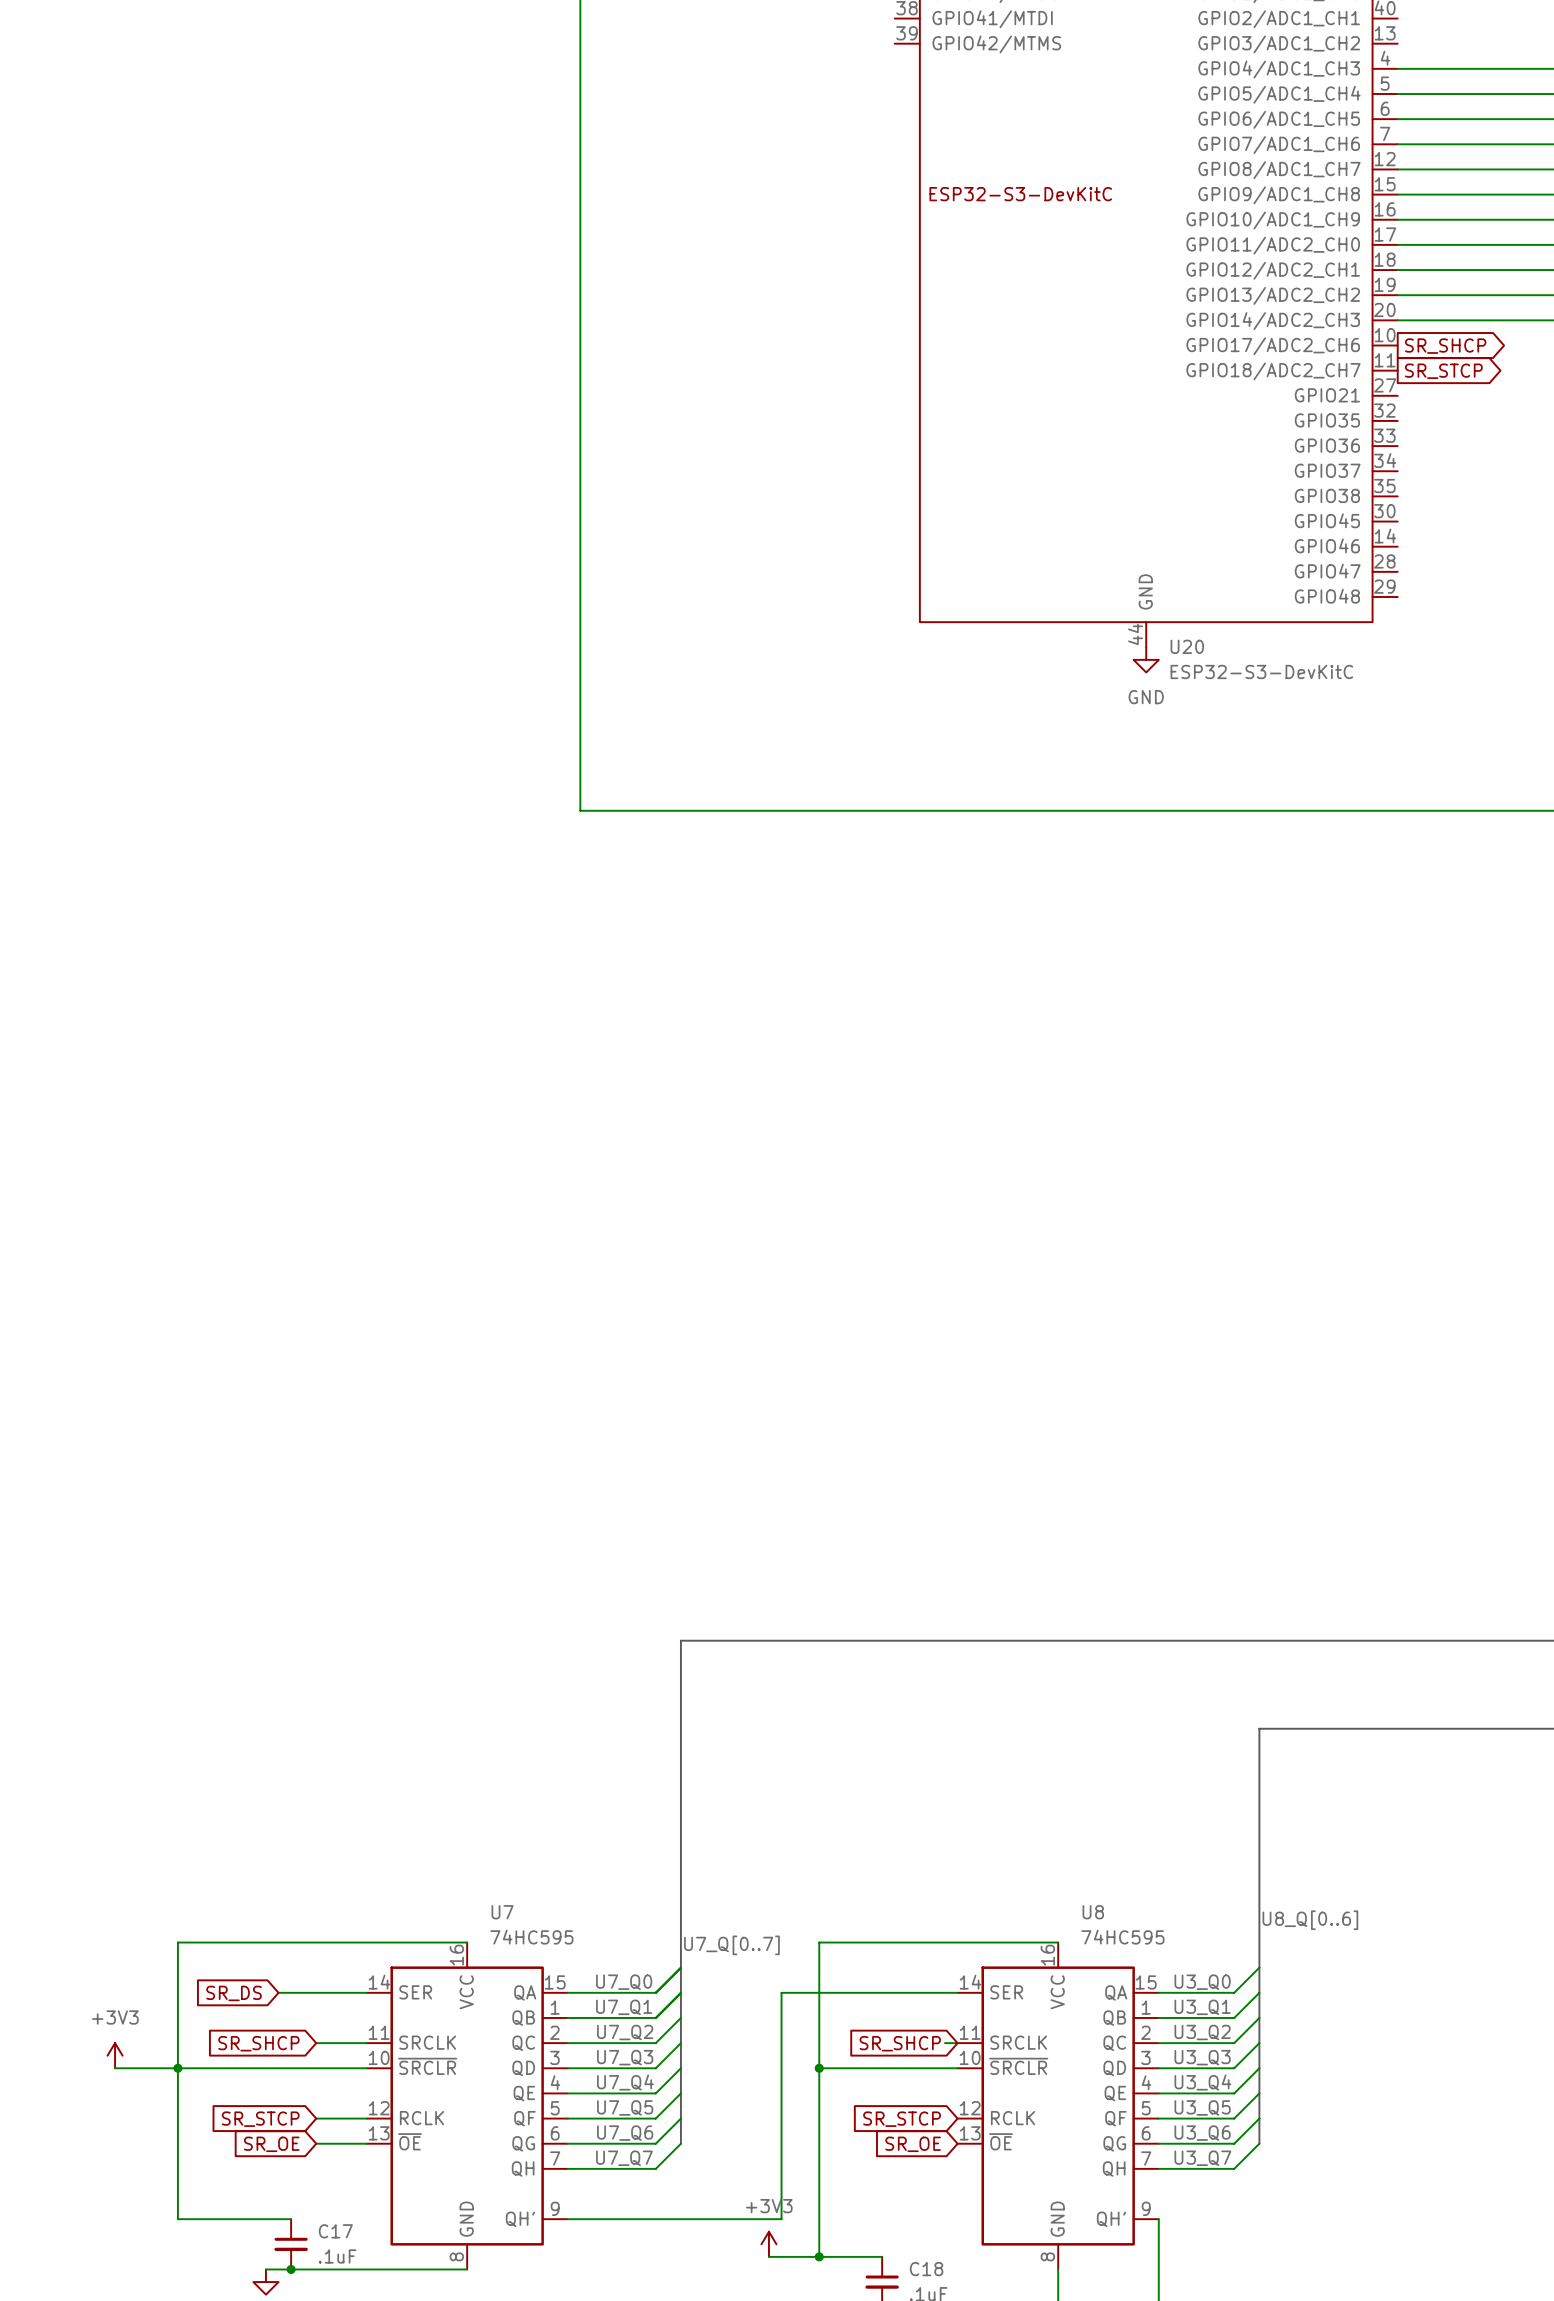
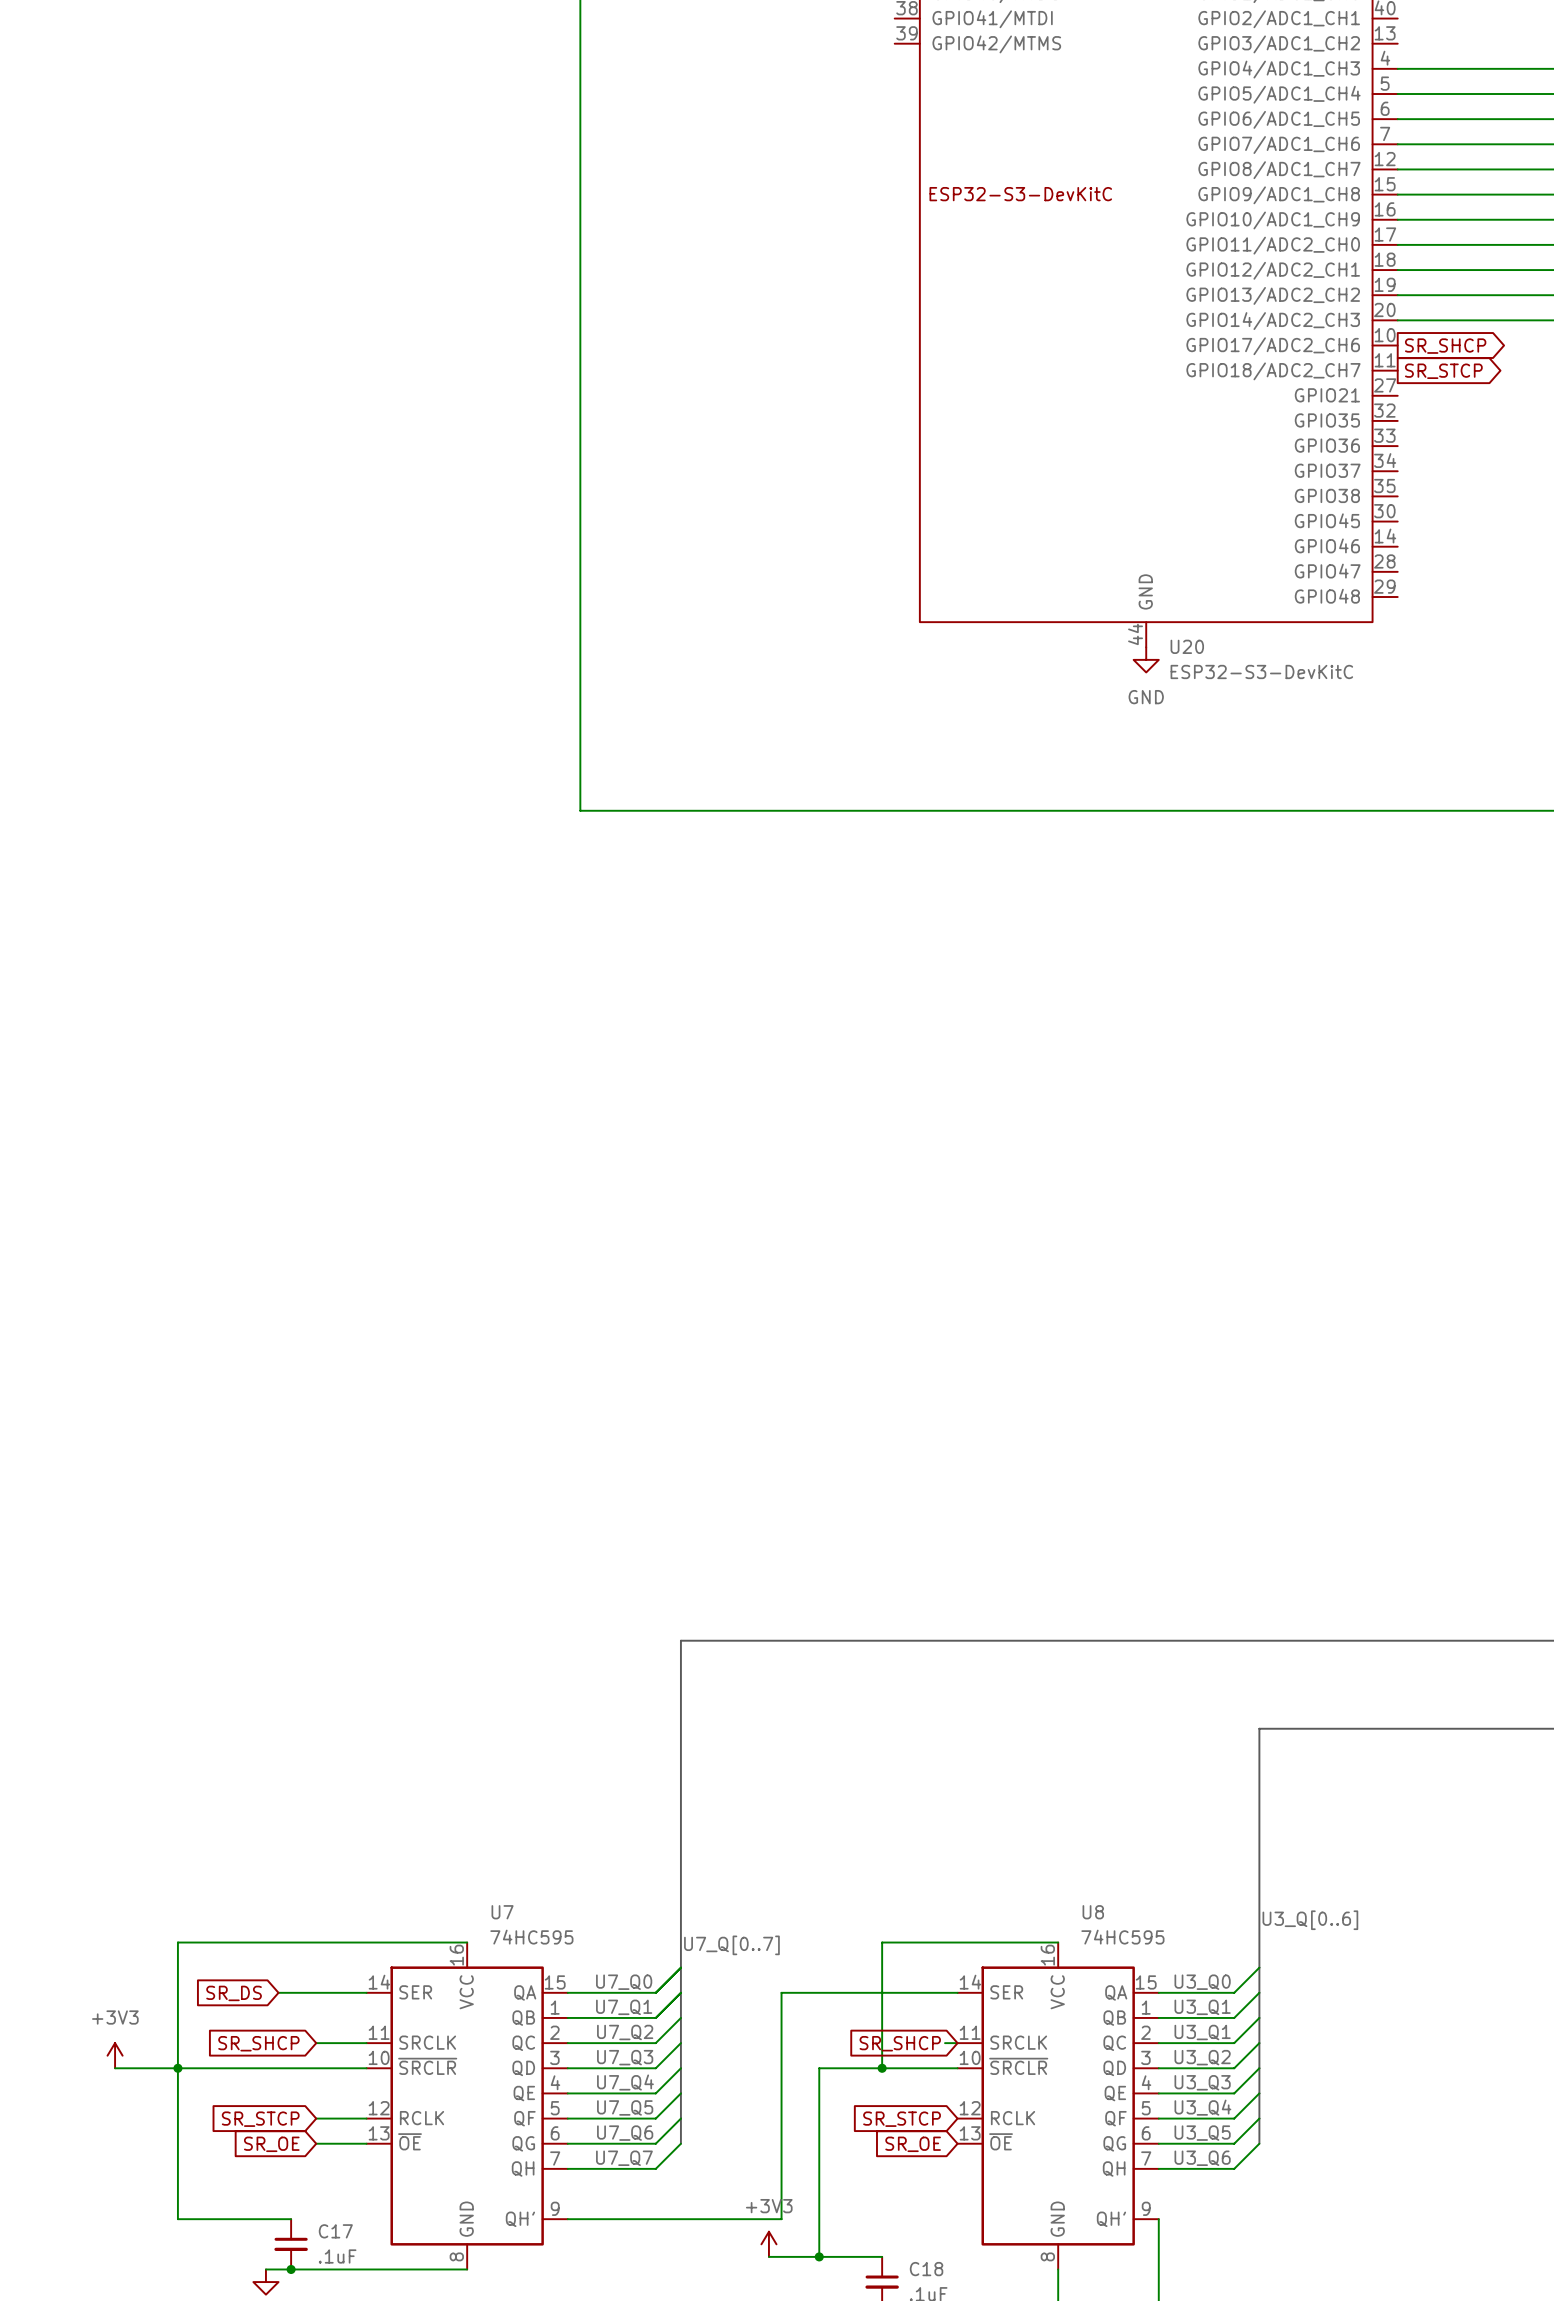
label: U8_Q[0..6] (1310, 1920) -> U3_Q[0..6] (1310, 1920)
wire: (882, 1942) (819, 1942) (819, 2068) -> (882, 1942) (882, 2068)
label: U3_Q2 (1202, 2032) -> U3_Q1 (1202, 2032)
label: U3_Q3 (1202, 2057) -> U3_Q2 (1202, 2057)
junction: (819, 2068) -> none
junction: none -> (882, 2068)
label: U3_Q4 (1202, 2082) -> U3_Q3 (1202, 2082)
label: U3_Q5 (1202, 2107) -> U3_Q4 (1202, 2107)
label: U3_Q6 (1202, 2133) -> U3_Q5 (1202, 2133)
label: U3_Q7 (1202, 2158) -> U3_Q6 (1202, 2158)

